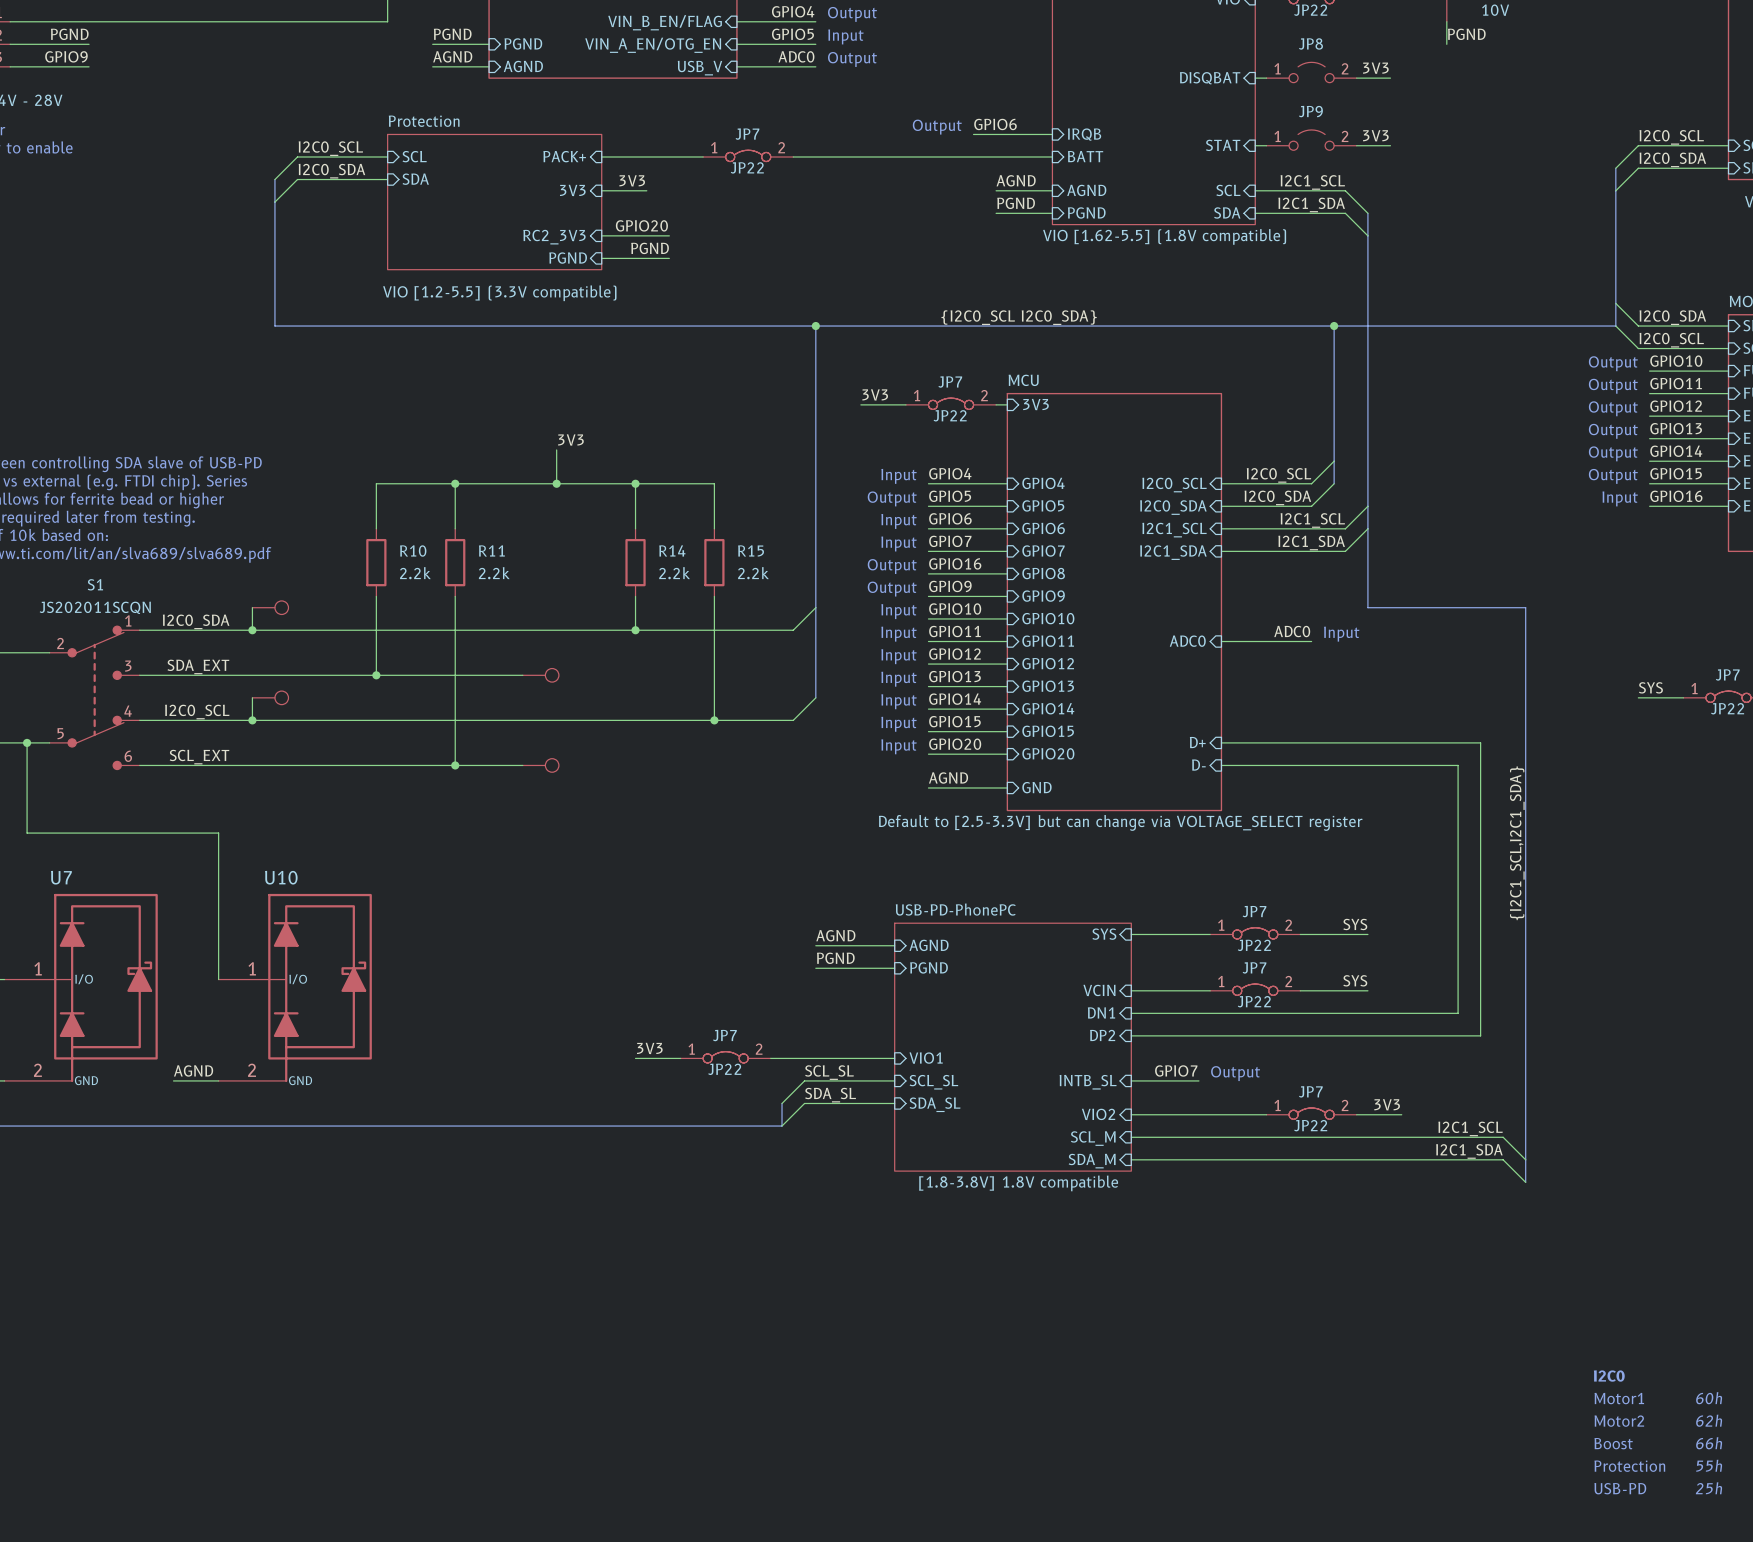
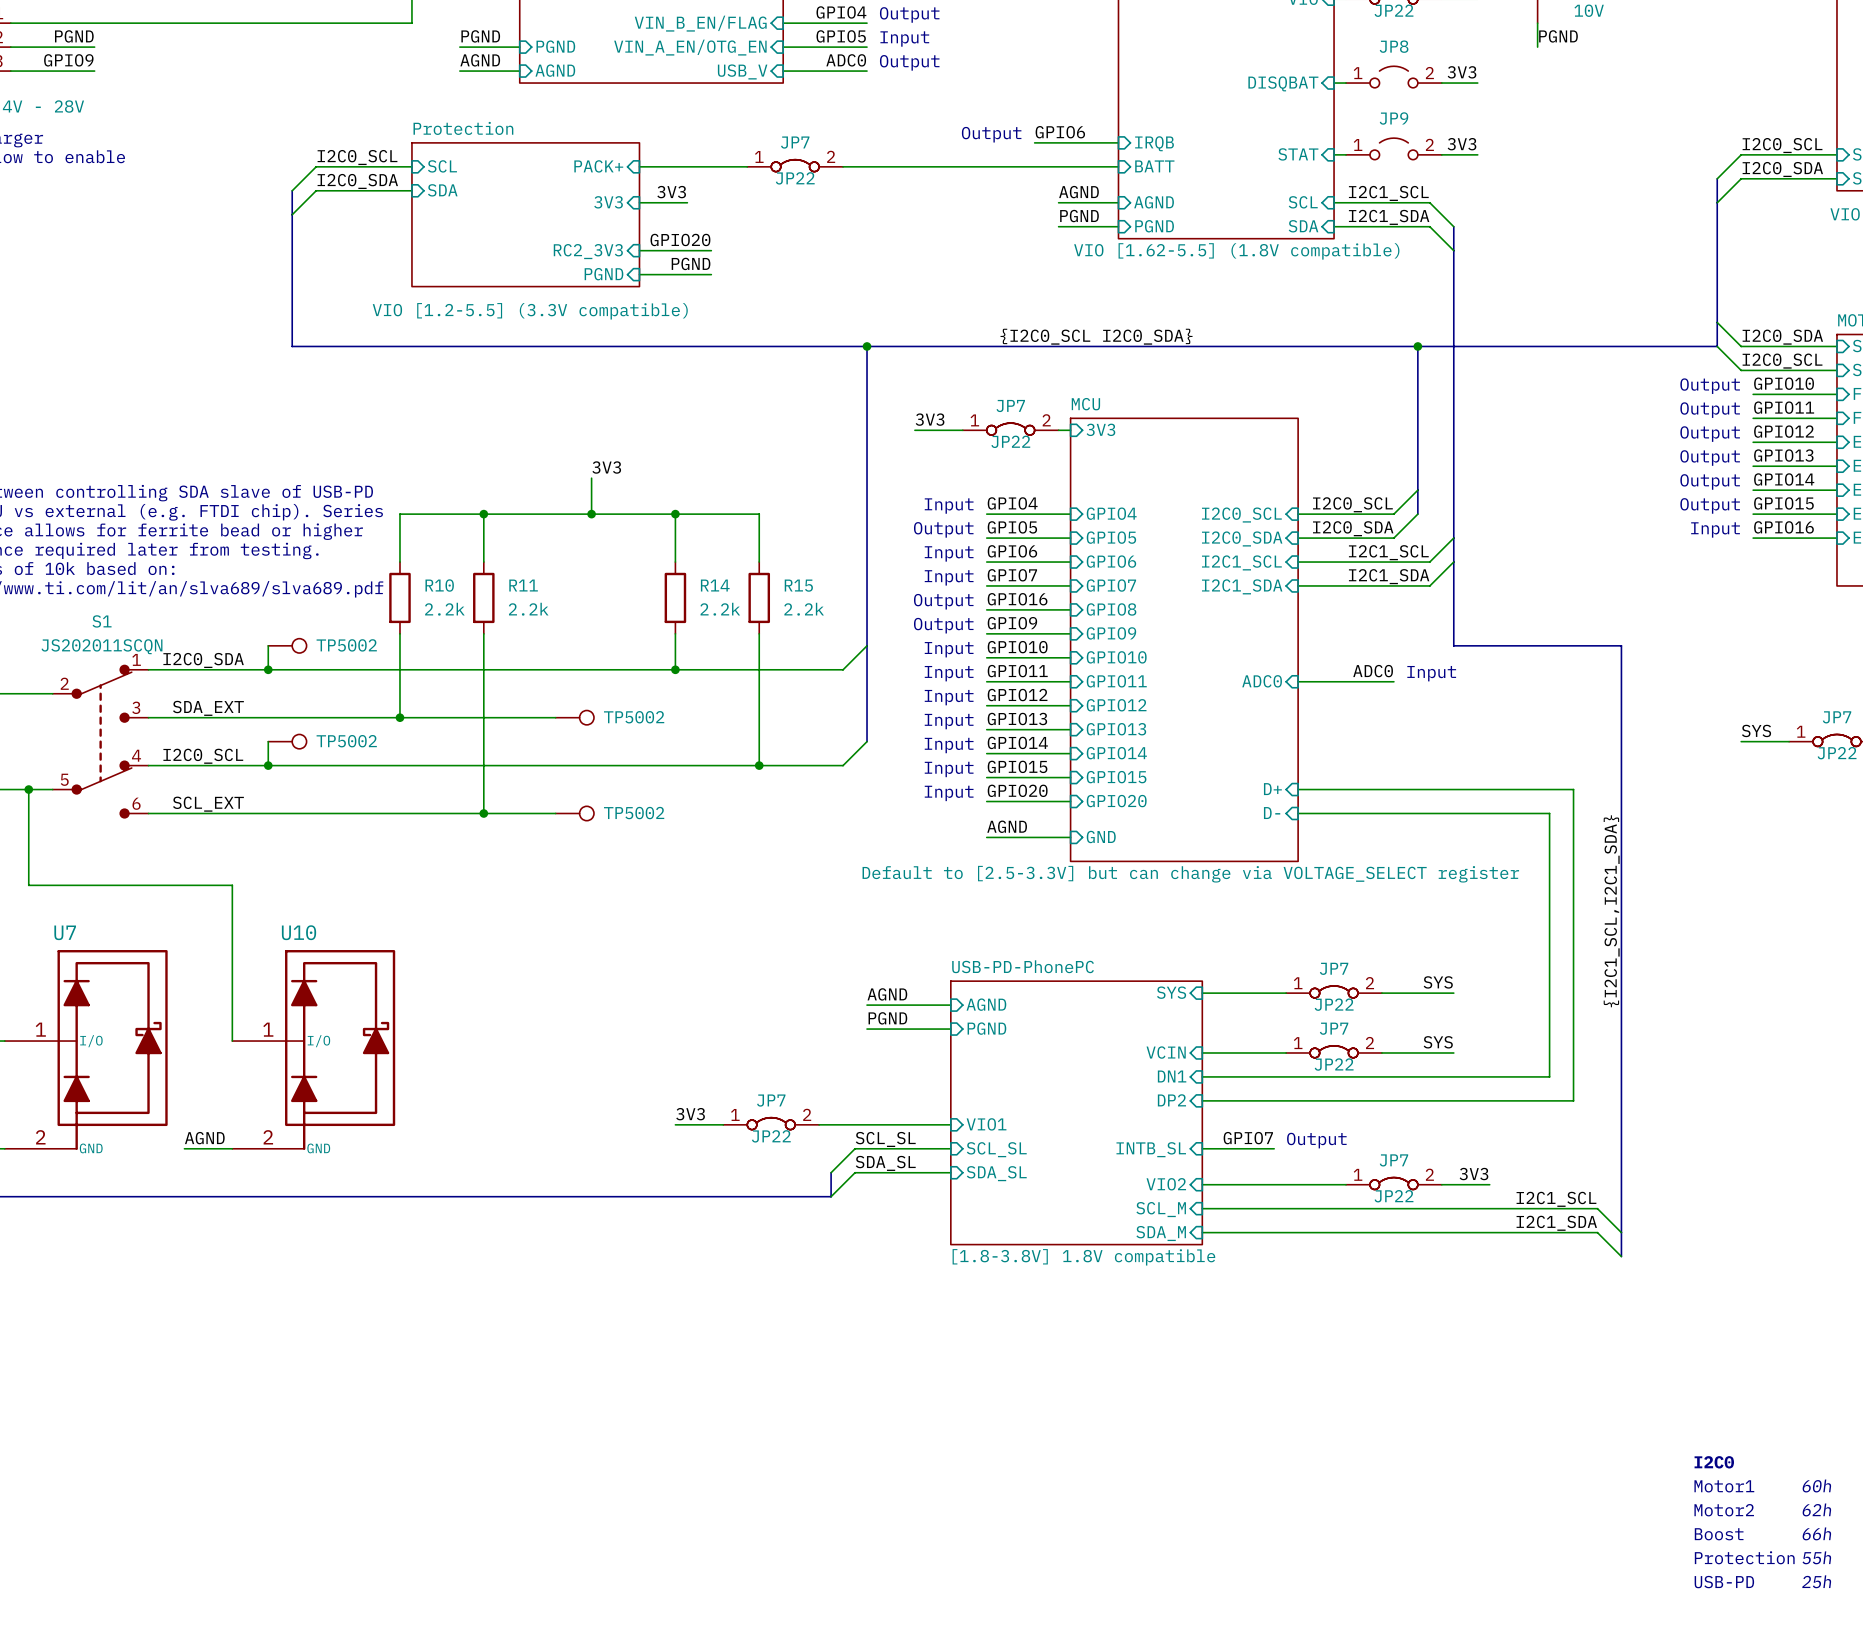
part value: none -> TP5002 (346, 645)
part value: none -> TP5002 (634, 717)
part value: none -> TP5002 (346, 741)
part value: none -> TP5002 (634, 813)

